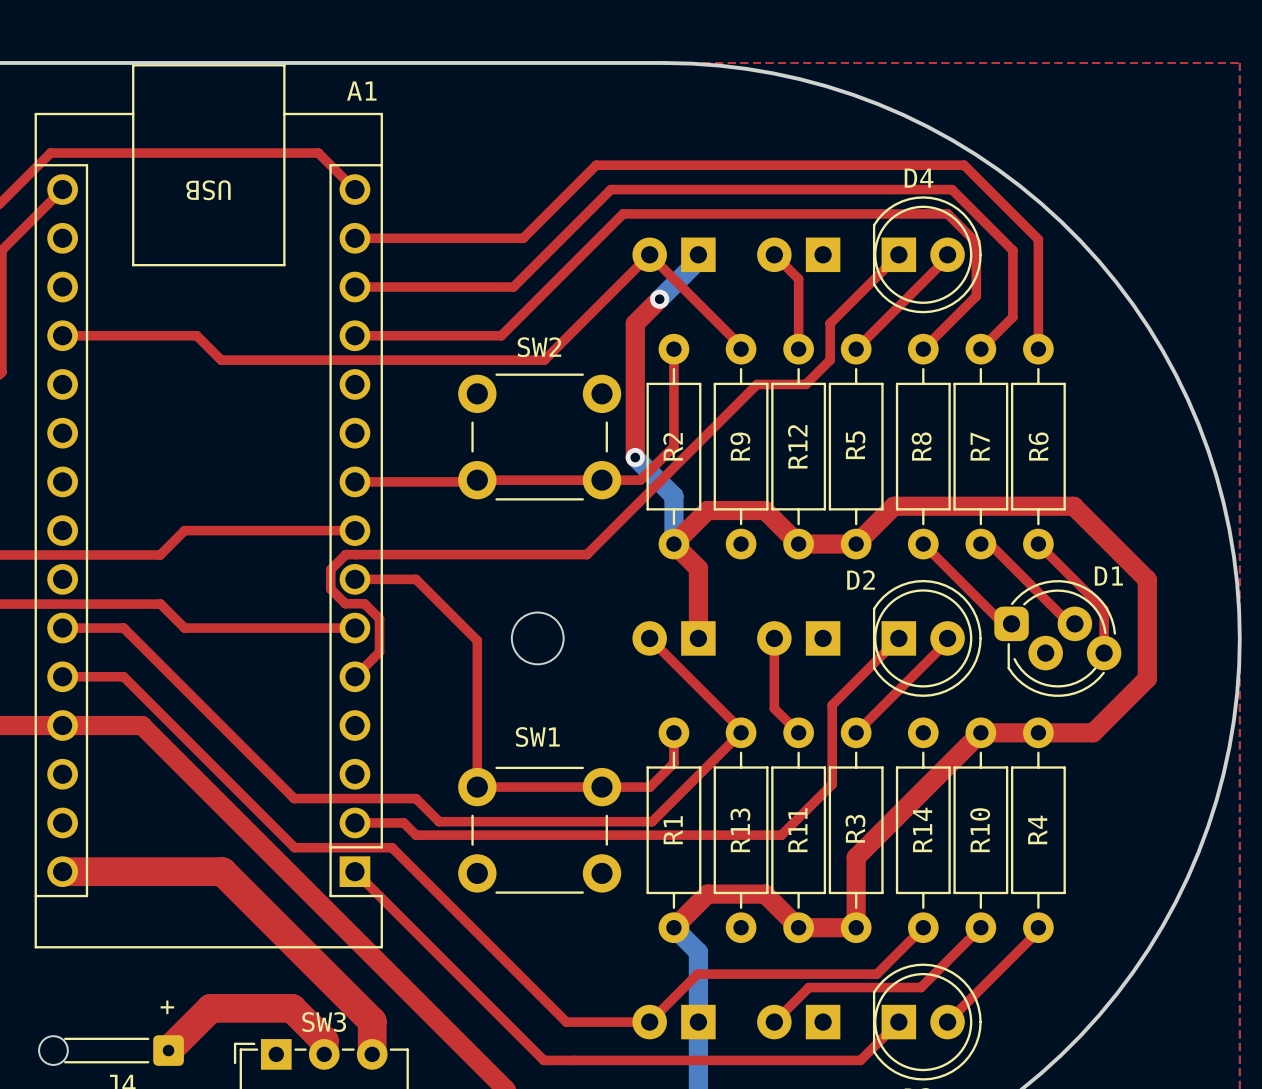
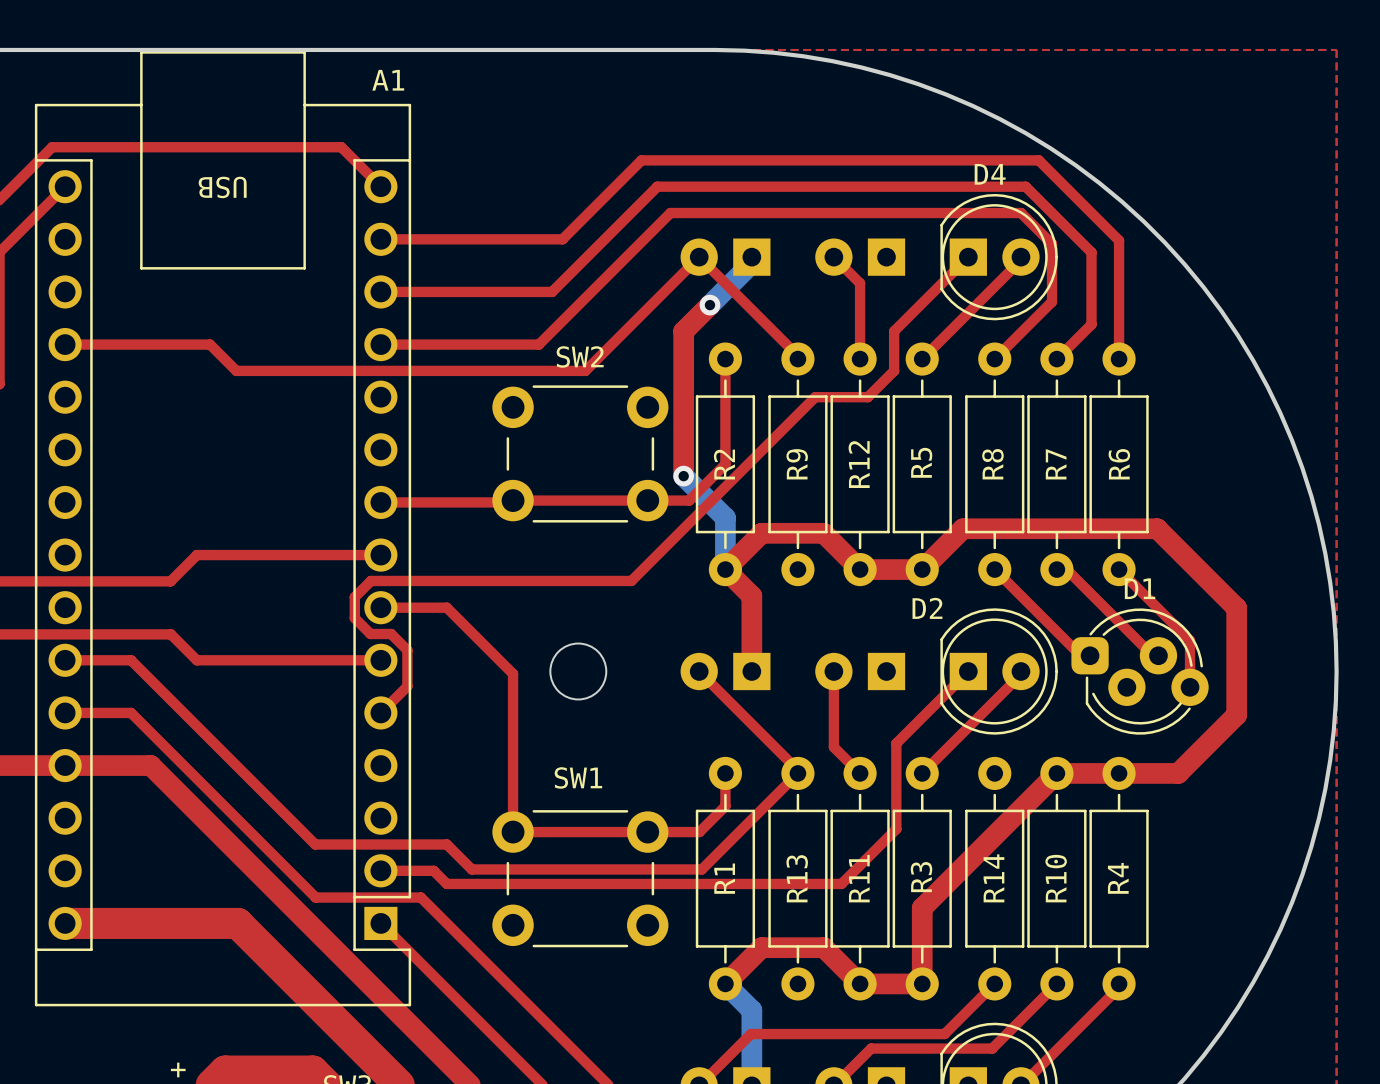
D1 name position: D1 (1108, 576) -> D1 (1140, 588)

